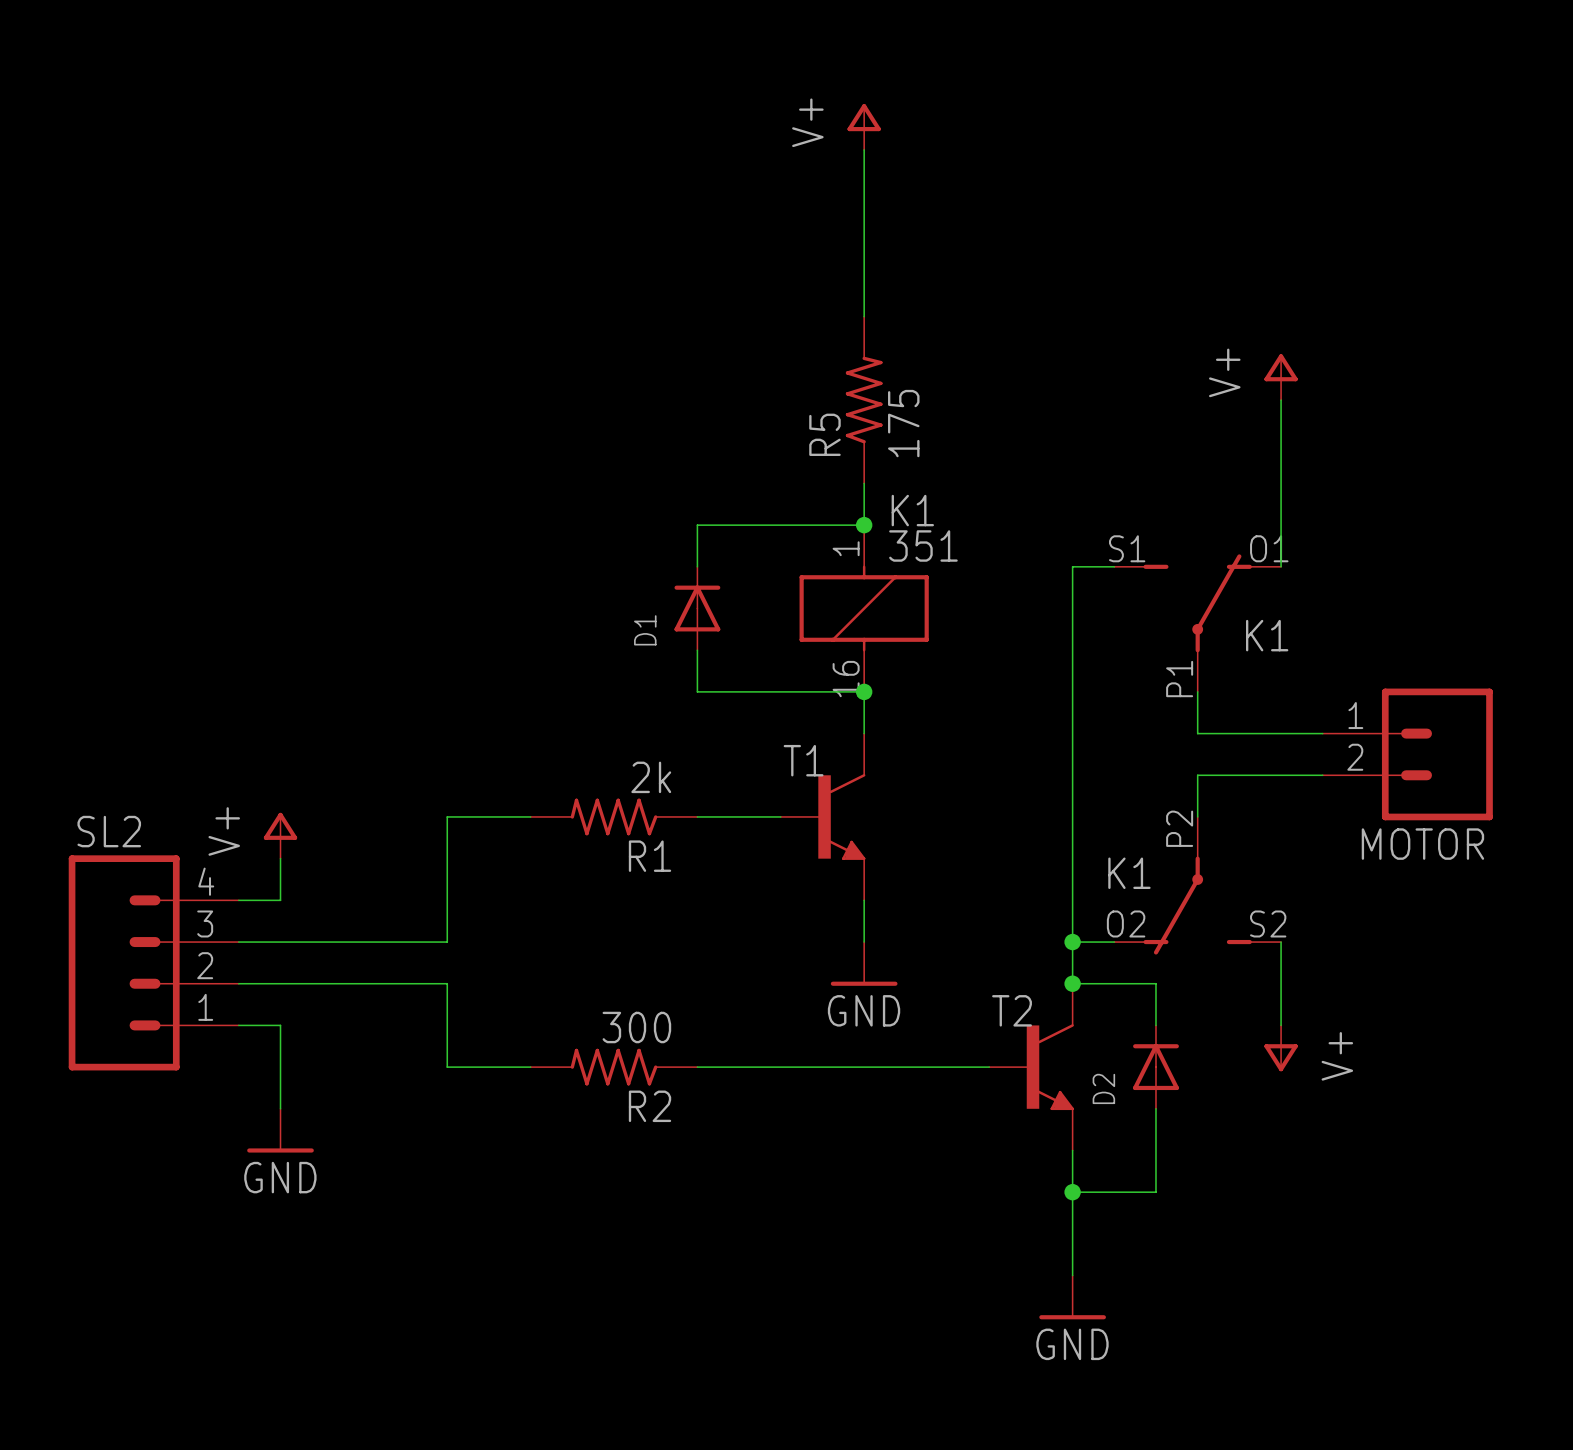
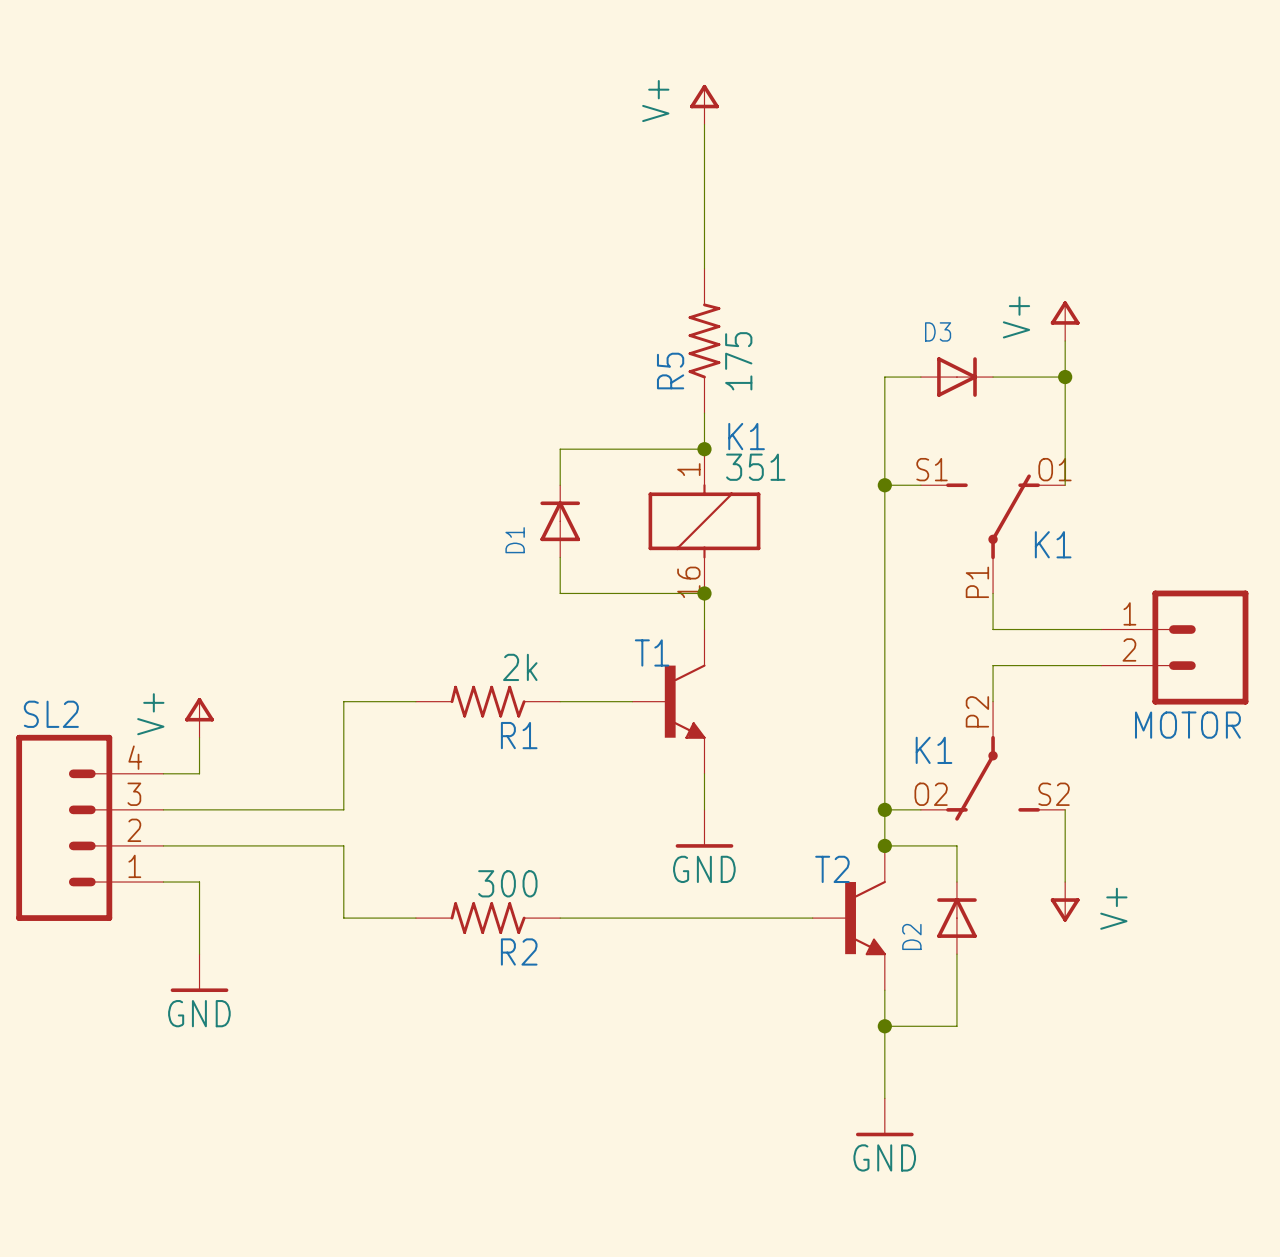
wire: none -> (920, 377) (884, 377) (884, 485)
D3: none -> (956, 377)
wire: none -> (993, 377) (1065, 377)
junction: none -> (1065, 377)
junction: none -> (884, 485)

